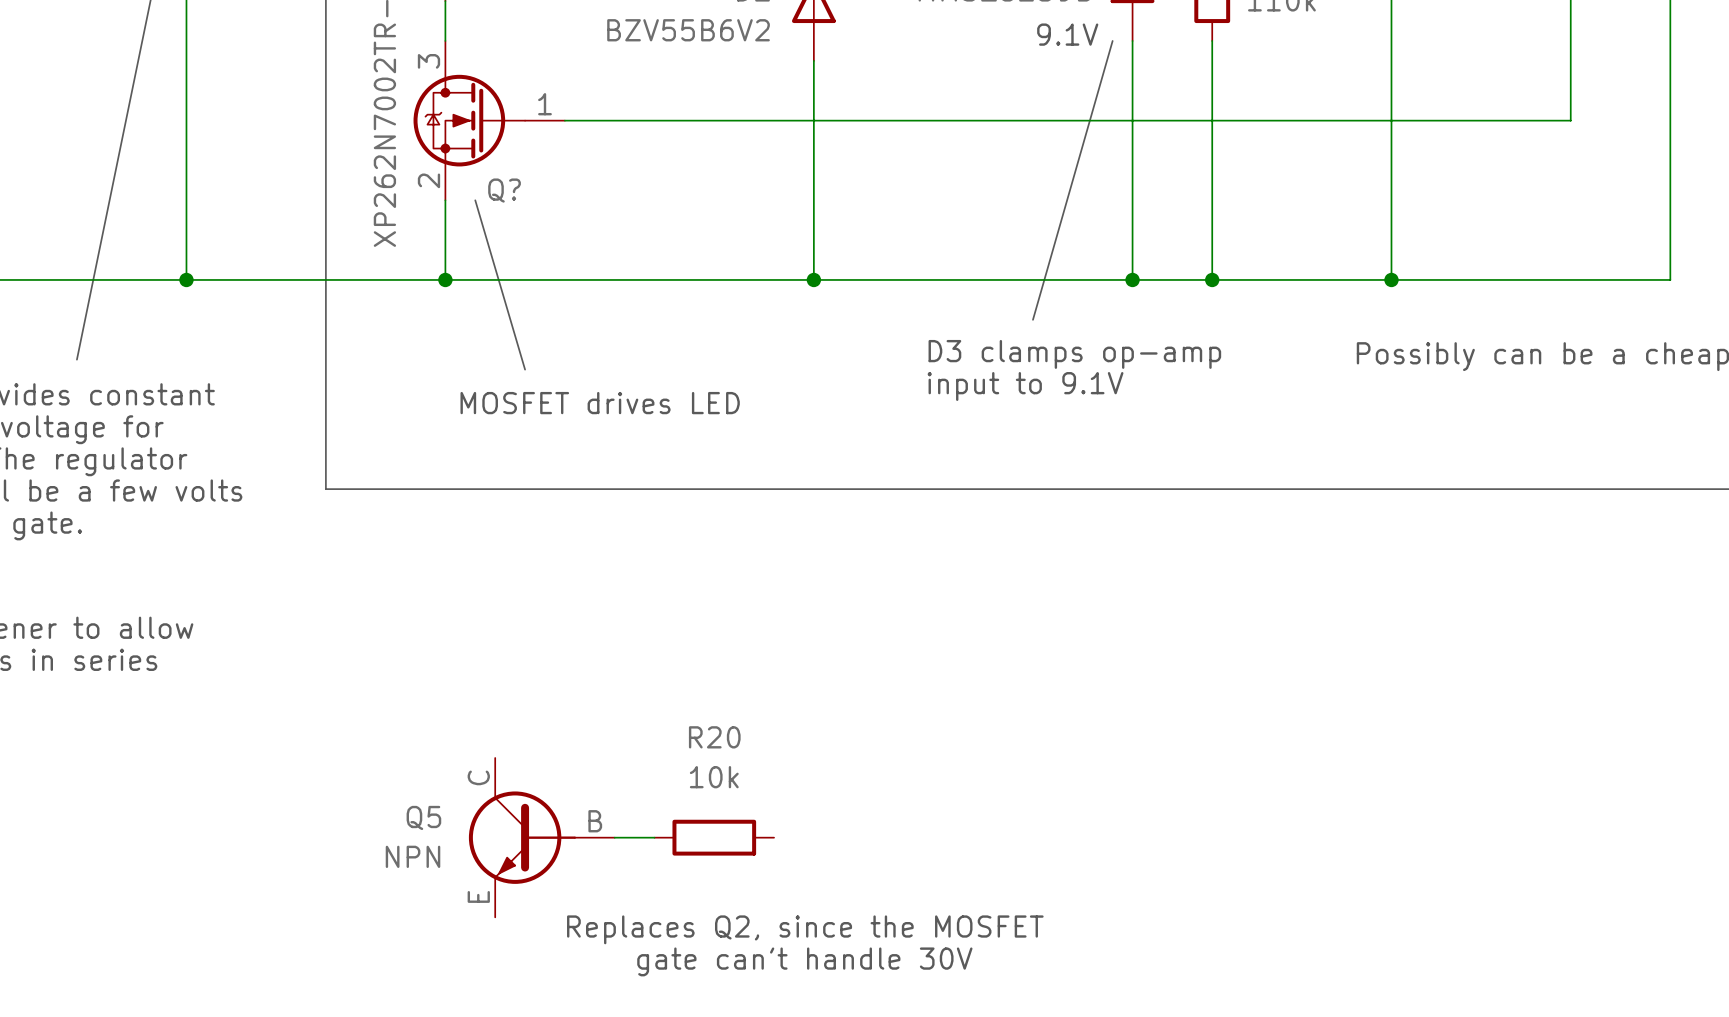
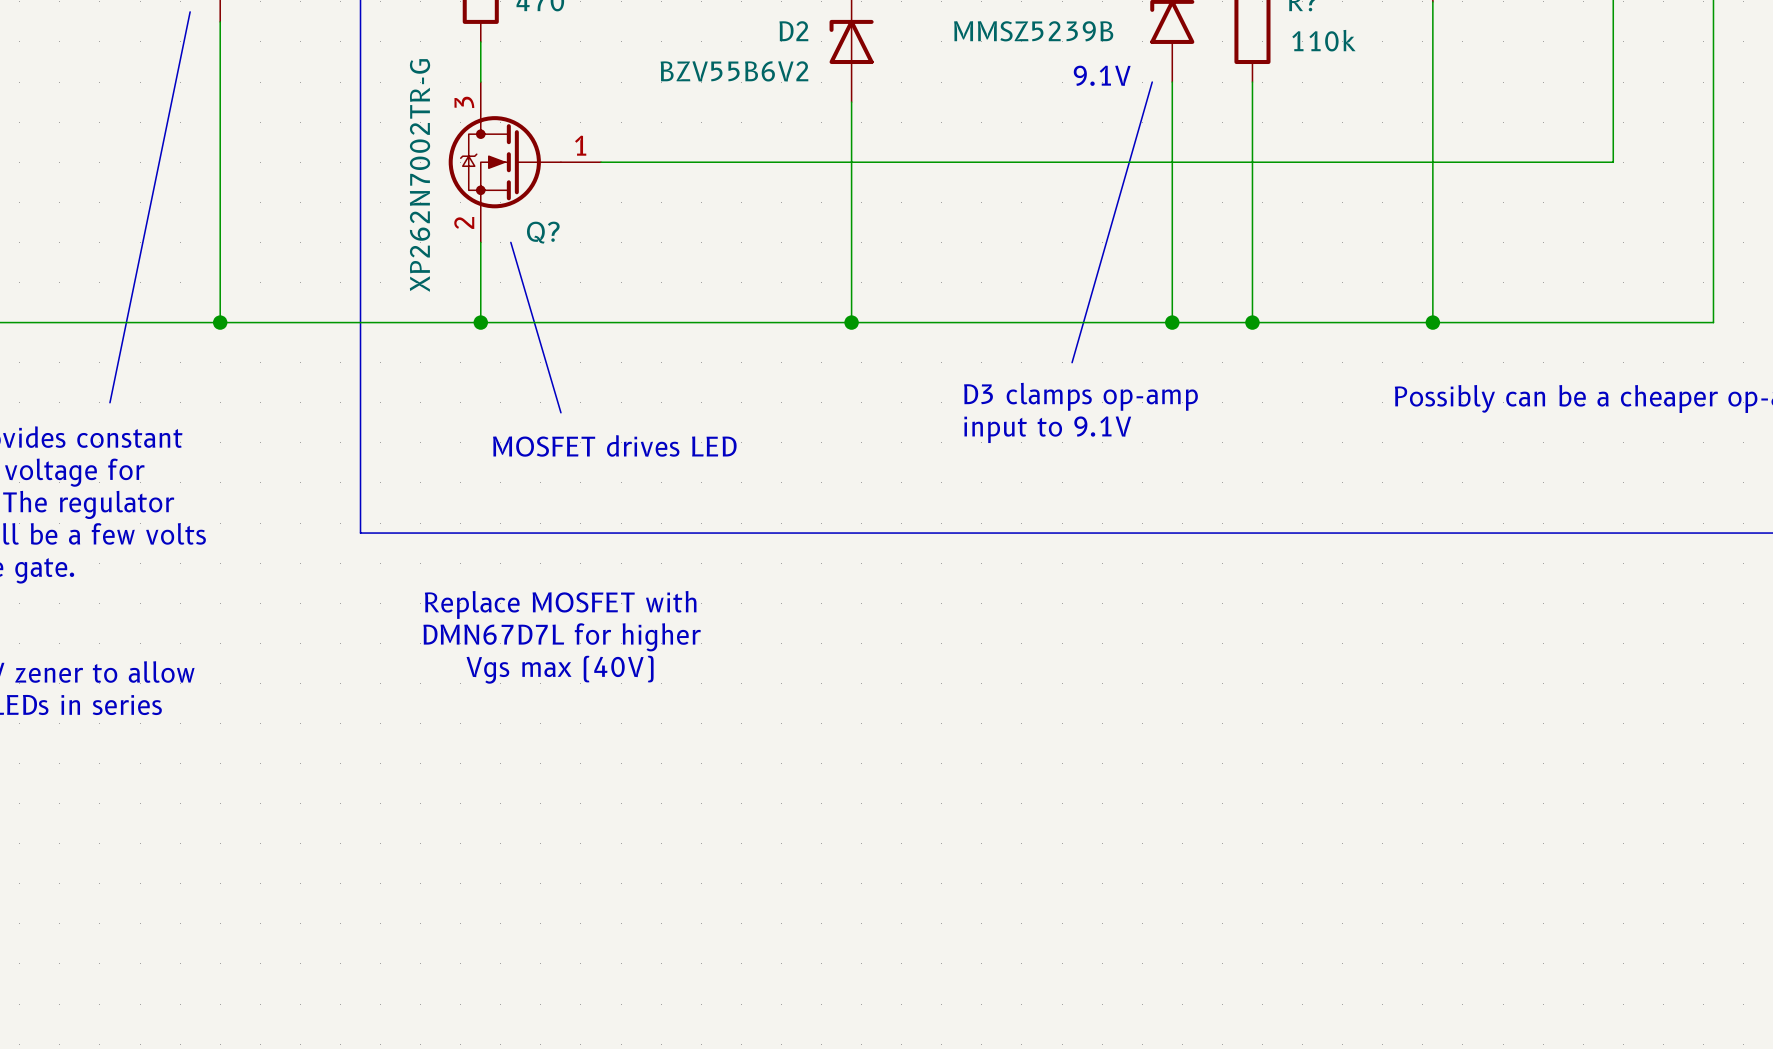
text: none -> Replace MOSFET with (560, 604)
text: none -> DMN67D7L for higher (562, 637)
text: none -> Vgs max (40V) (560, 669)
Q5: NPN (541, 837) -> none
wire: (614, 837) (654, 837) -> none
R20: 10k (714, 837) -> none
text: Replaces Q2, since the MOSFET (805, 929) -> none
text: gate can't handle 30V (804, 961) -> none

